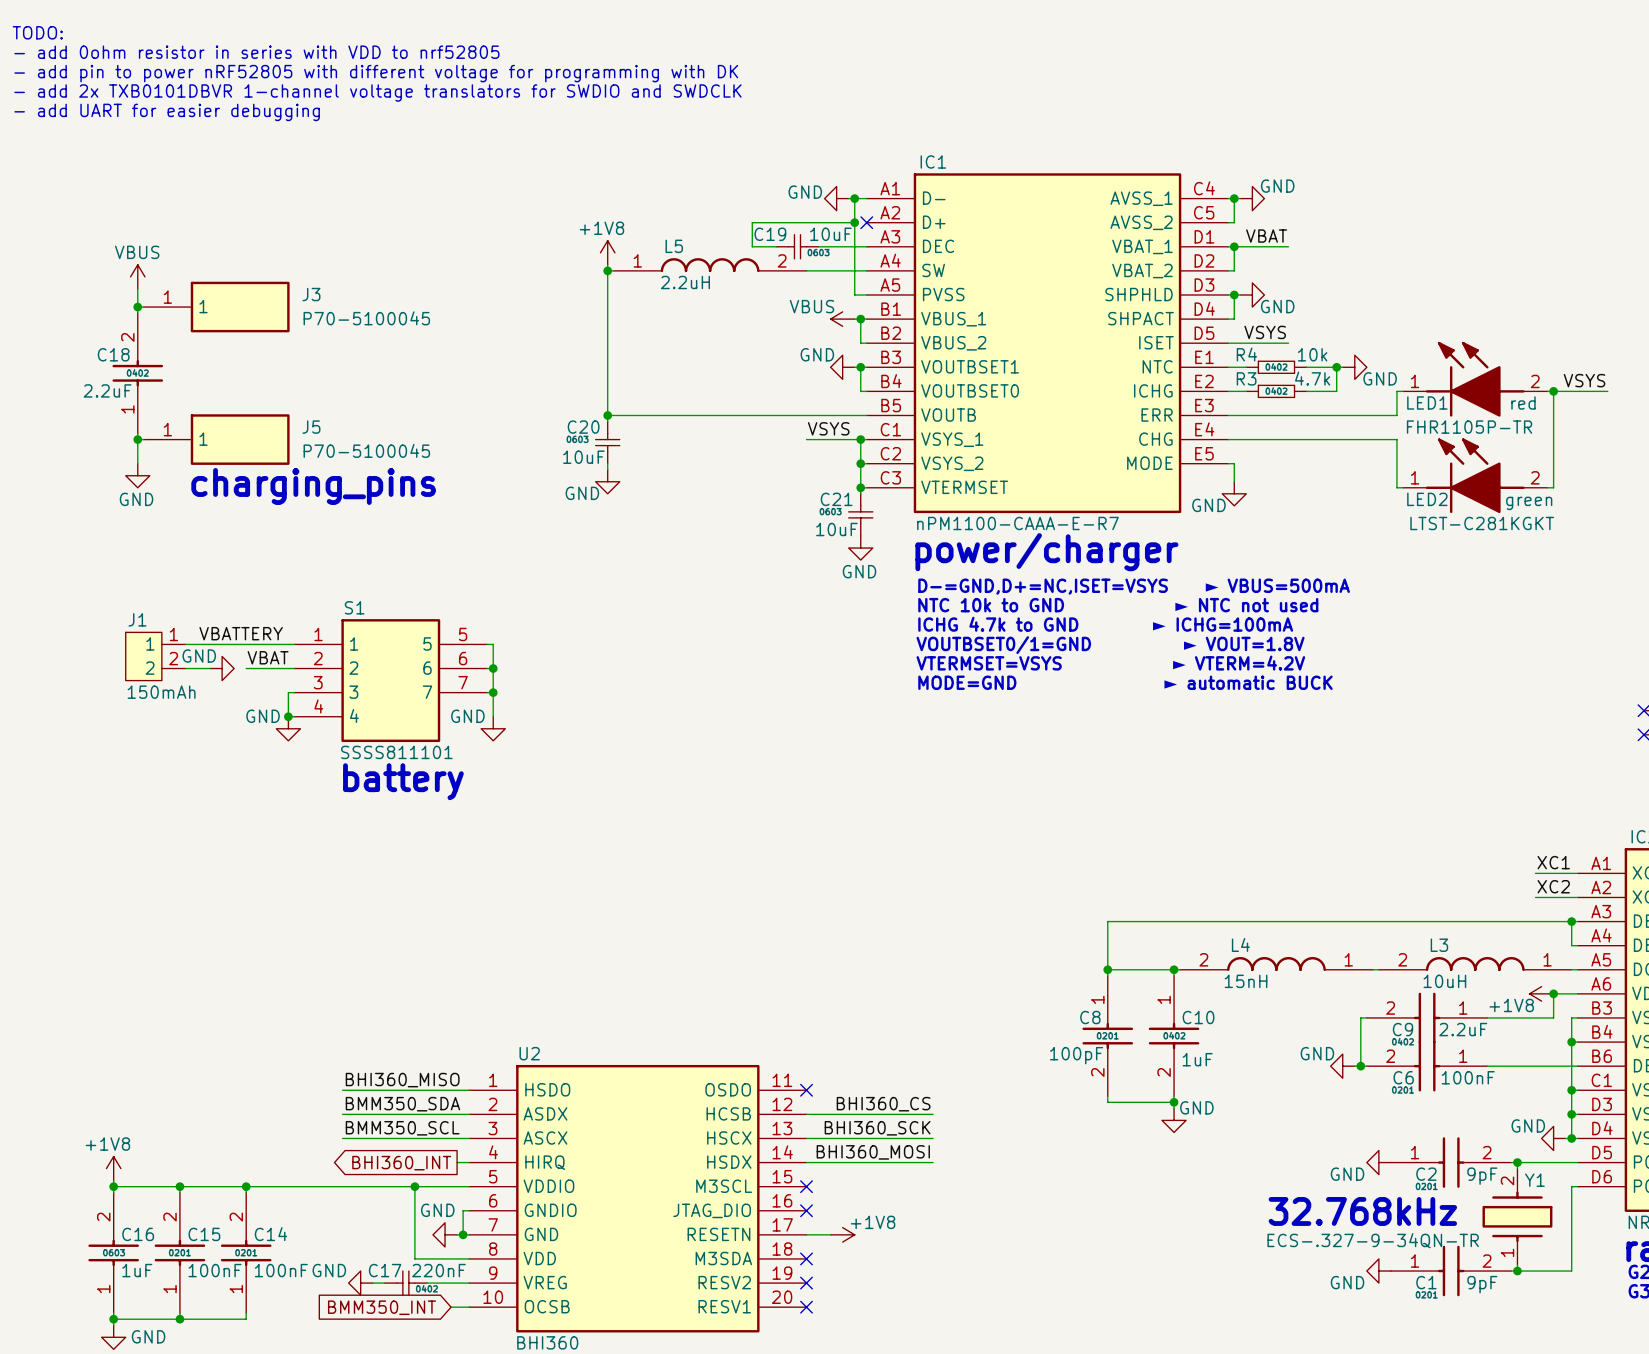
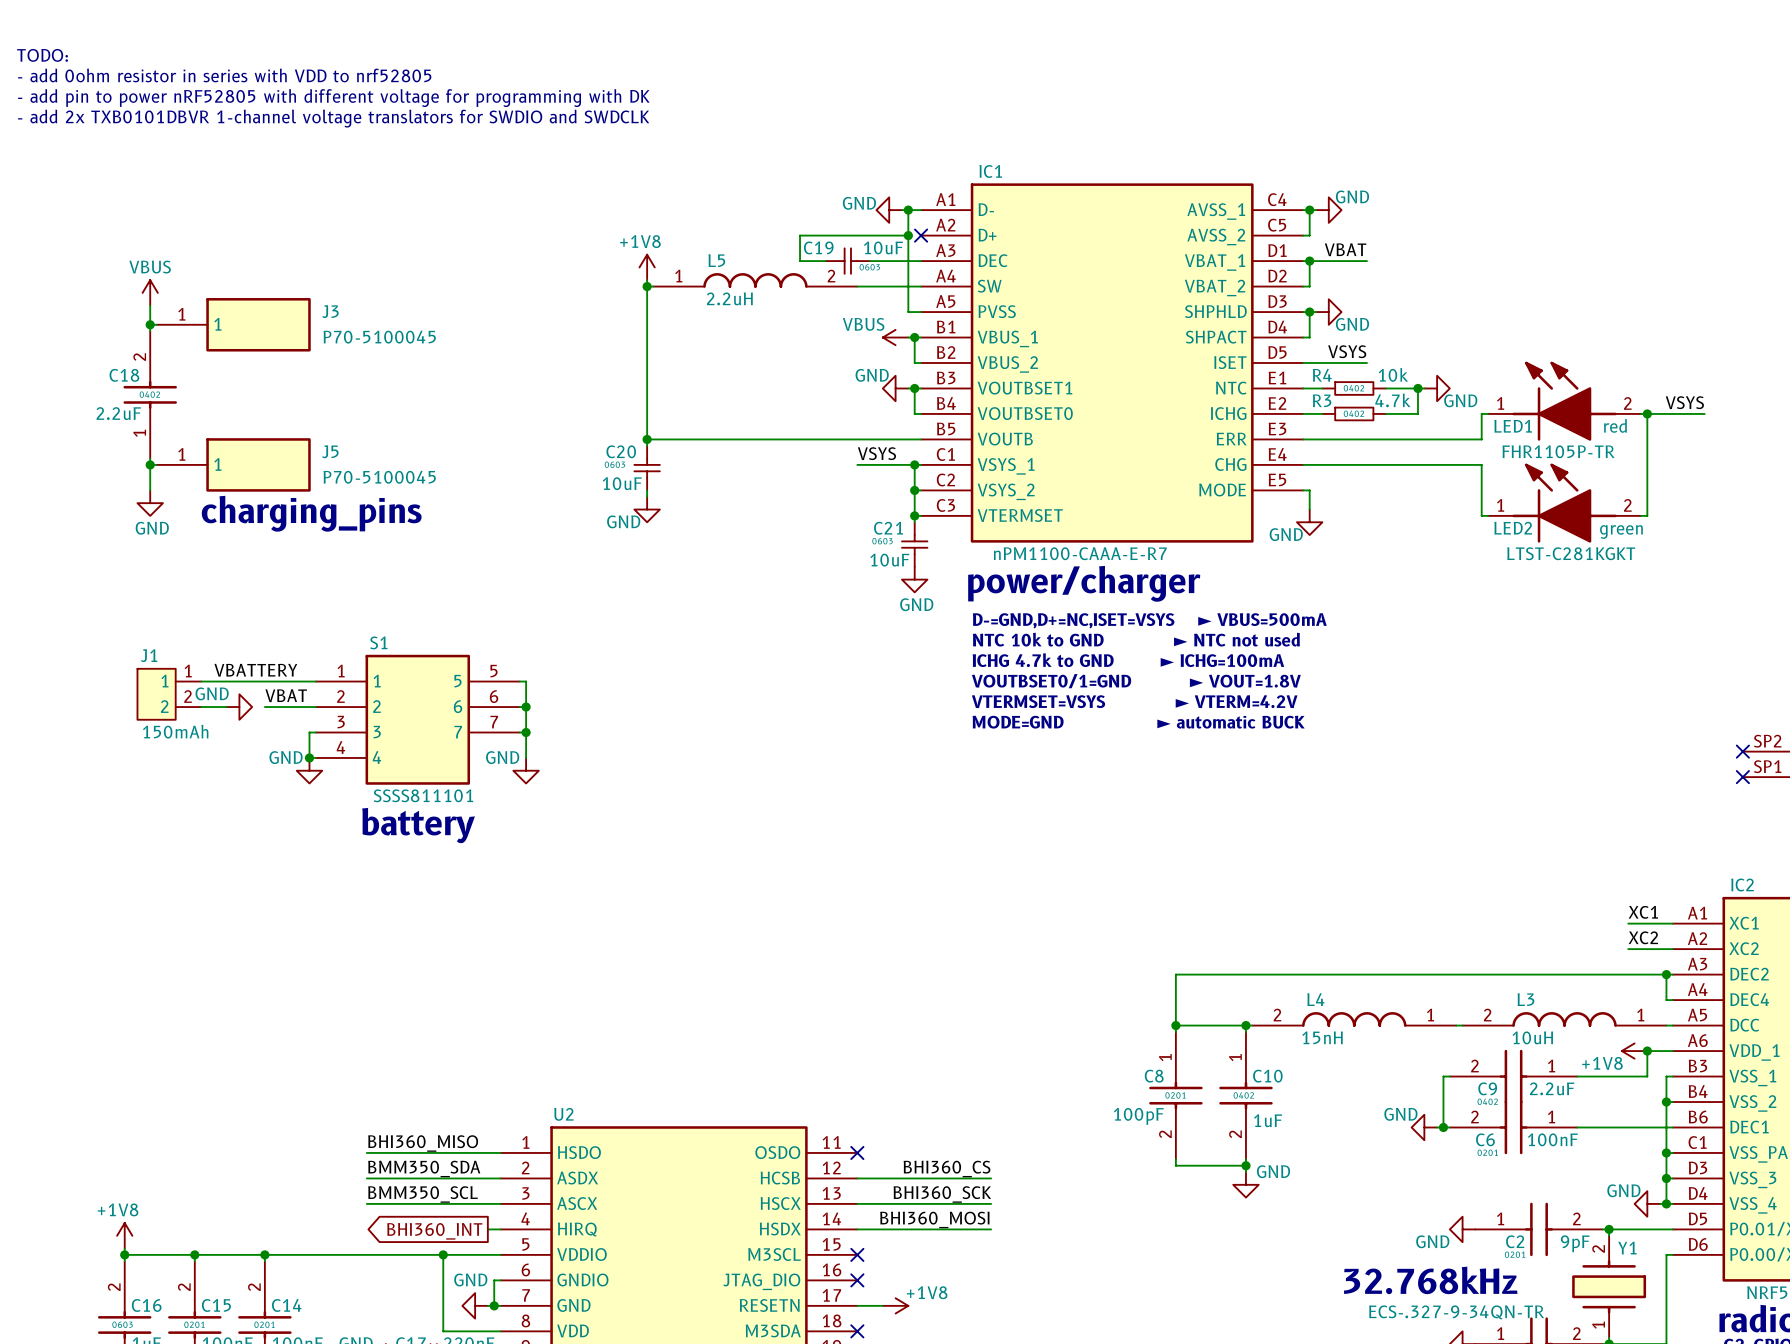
text: TODO: (37, 32) -> none
text: - add 0ohm resistor in series with VDD to nrf52805 (256, 52) -> TODO: (42, 55)
text: - add pin to power nRF52805 with different voltage for programming with DK (376, 73) -> - add 0ohm resistor in series with VDD to nrf52805 (224, 75)
text: - add 2x TXB0101DBVR 1-channel voltage translators for SWDIO and SWDCLK (377, 93) -> - add pin to power nRF52805 with different voltage for programming with DK (333, 98)
text: - add UART for easier debugging (167, 112) -> - add 2x TXB0101DBVR 1-channel voltage translators for SWDIO and SWDCLK (333, 118)

